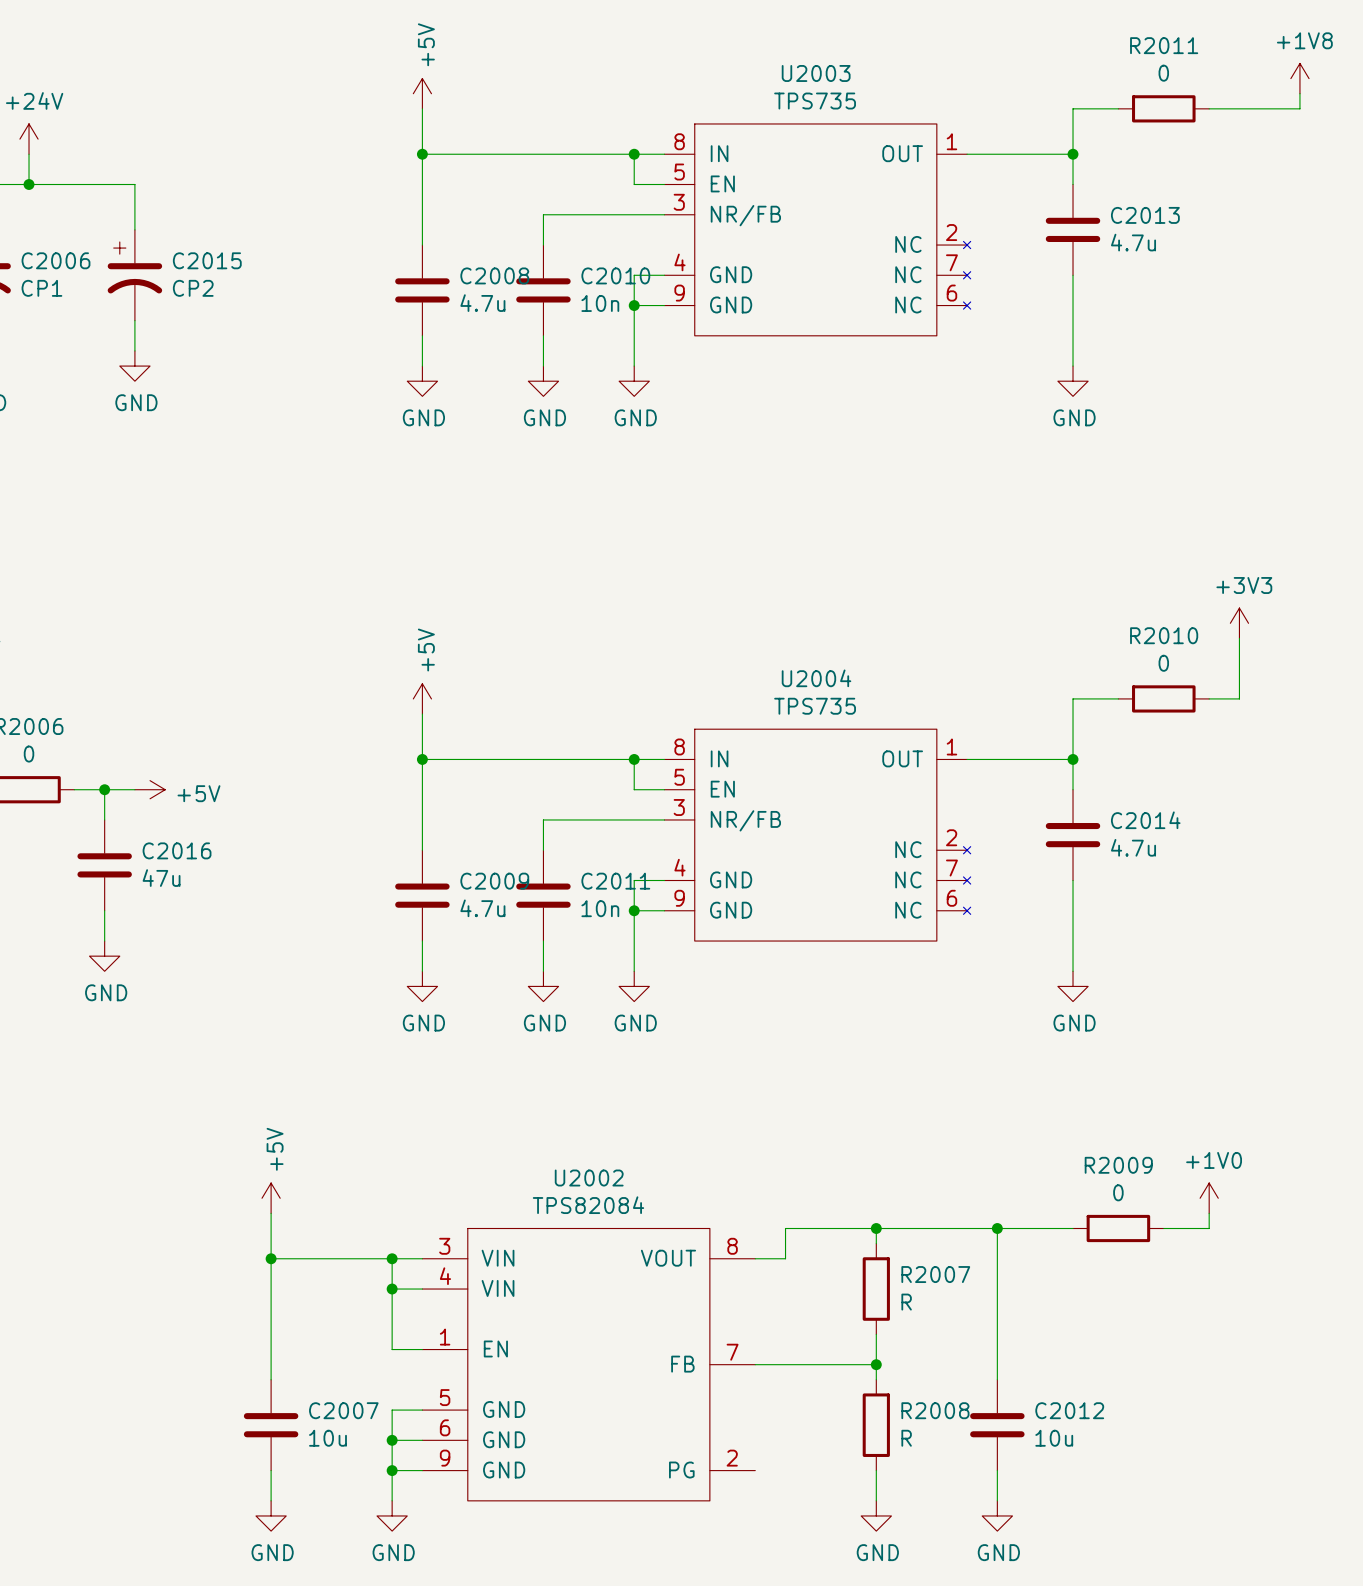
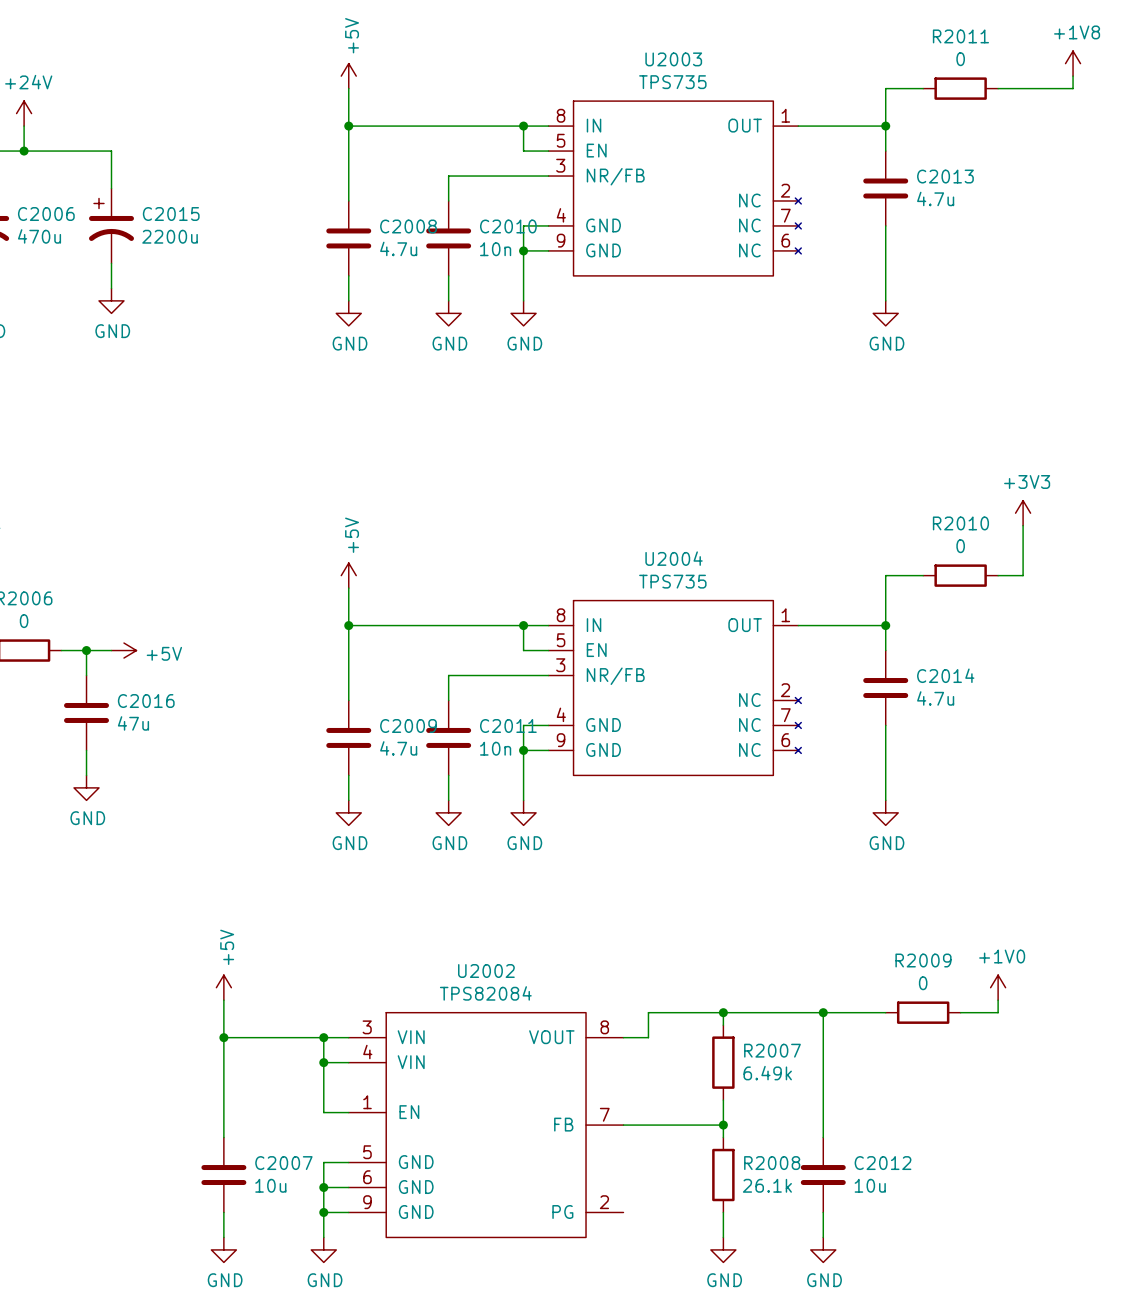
C2006 value: CP1 (41, 288) -> 470u (39, 236)
C2015 value: CP2 (193, 288) -> 2200u (170, 236)
R2007 value: R (906, 1302) -> 6.49k (767, 1073)
R2008 value: R (906, 1438) -> 26.1k (767, 1185)

